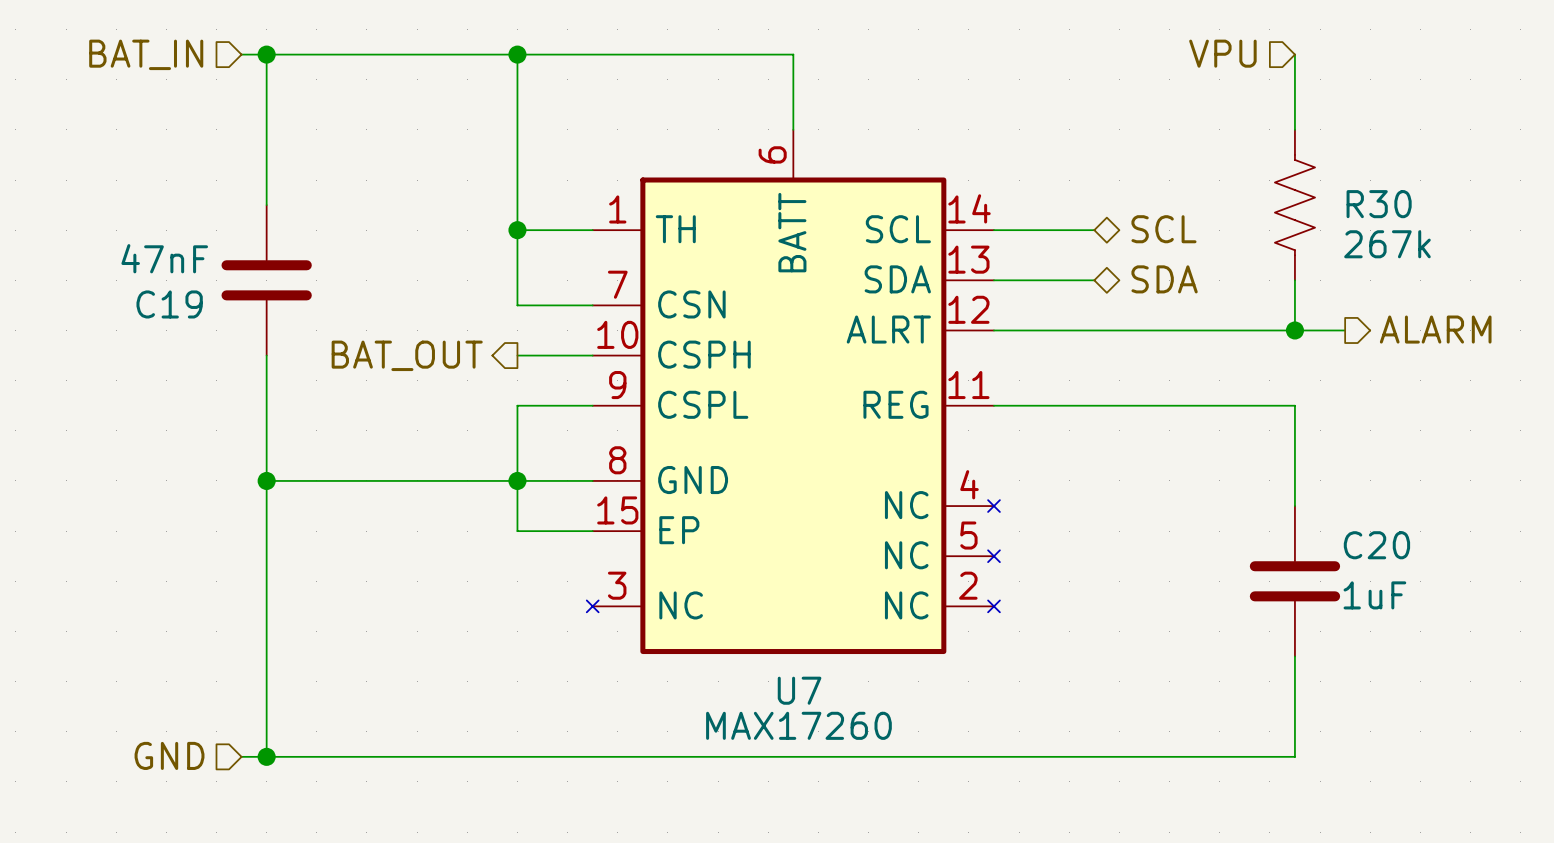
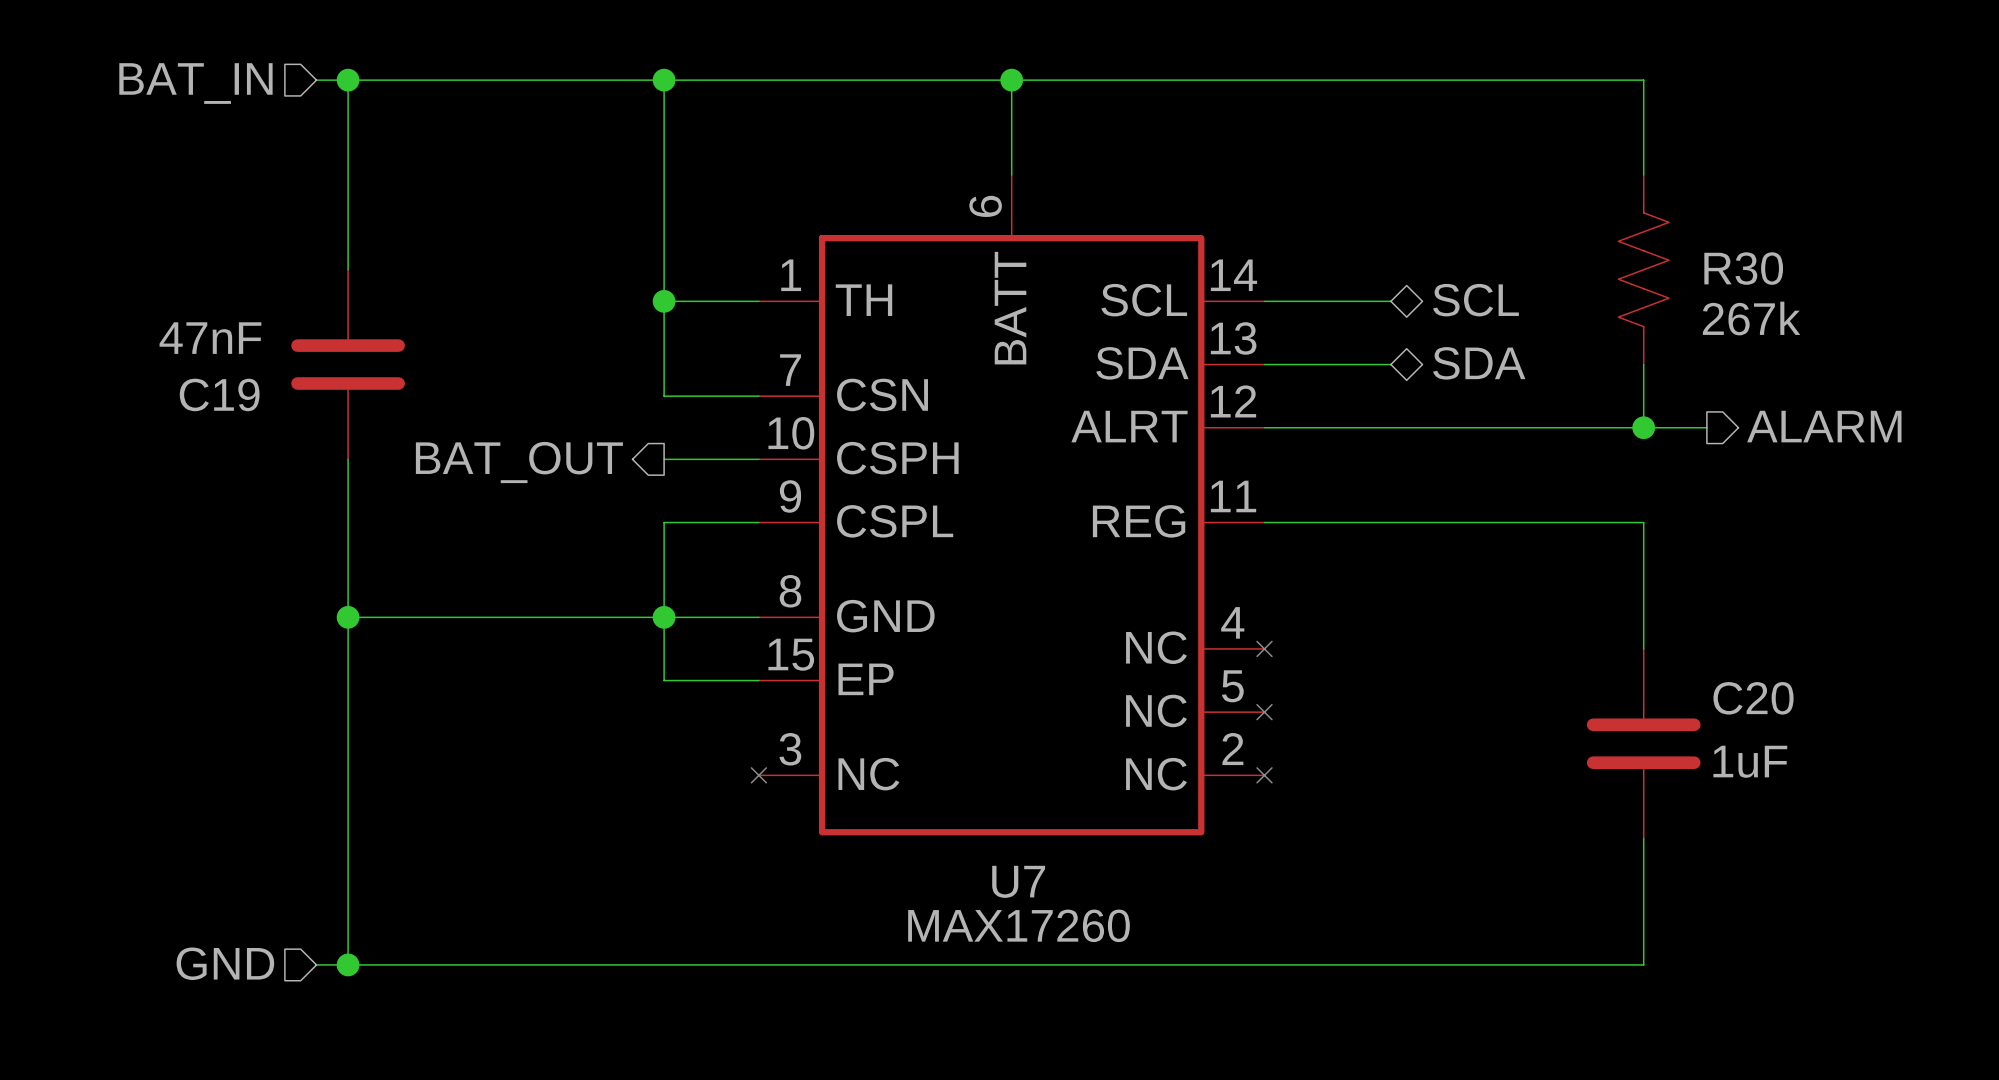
hierarchical label: VPU (1222, 53) -> none
wire: none -> (1011, 80) (1643, 80)
junction: none -> (1011, 80)

